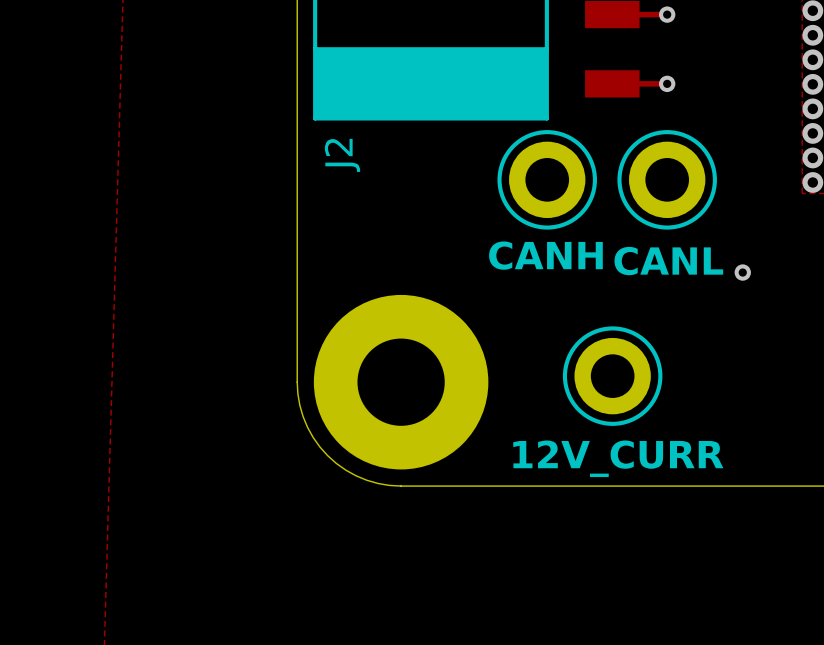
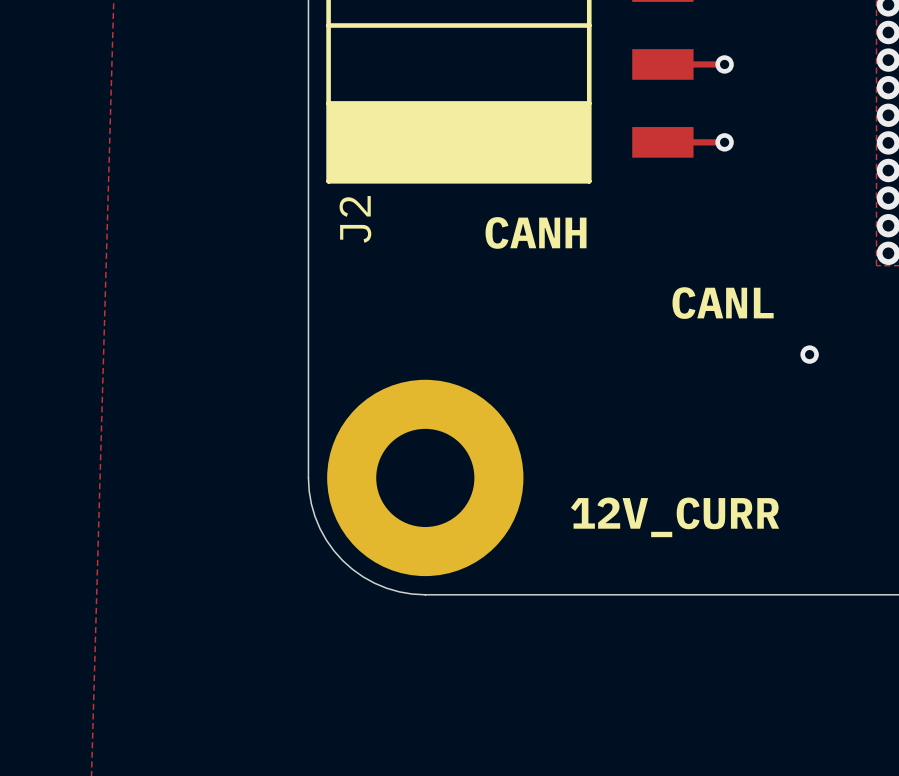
part: (547, 179) -> none
part: (667, 179) -> none
text position: CANH (545, 255) -> CANH (536, 232)
text position: CANL (668, 261) -> CANL (723, 303)
part: (612, 376) -> none
text position: 12V_CURR (618, 458) -> 12V_CURR (675, 517)

